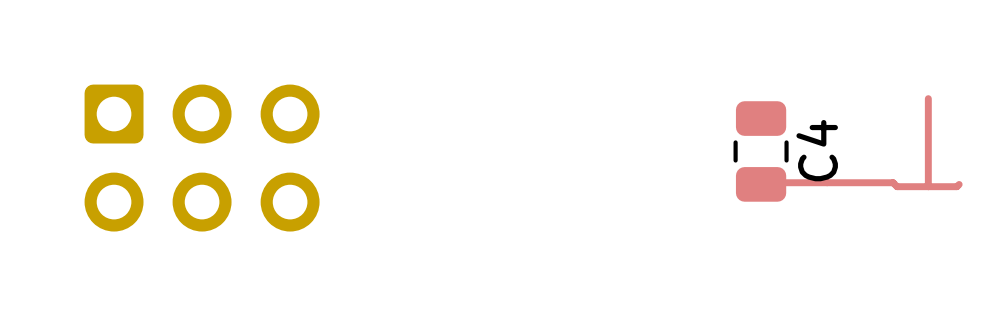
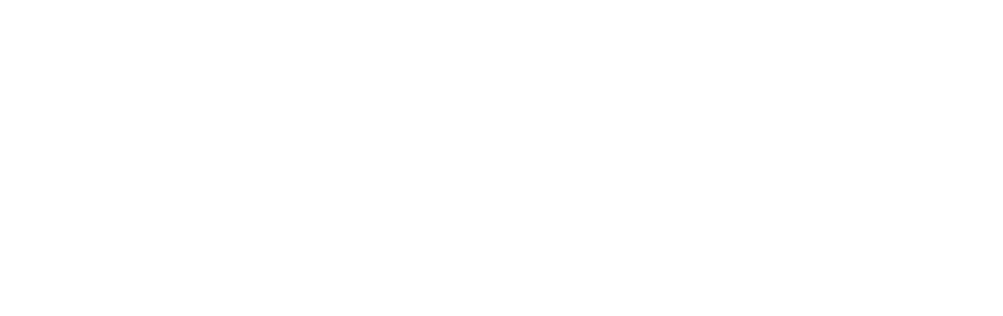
track: (928, 98) (928, 186) -> none
C4: (761, 151) -> none
part: (202, 158) -> none
track: (959, 184) (956, 186) (897, 186) (893, 182) (767, 182) (761, 188) -> none

